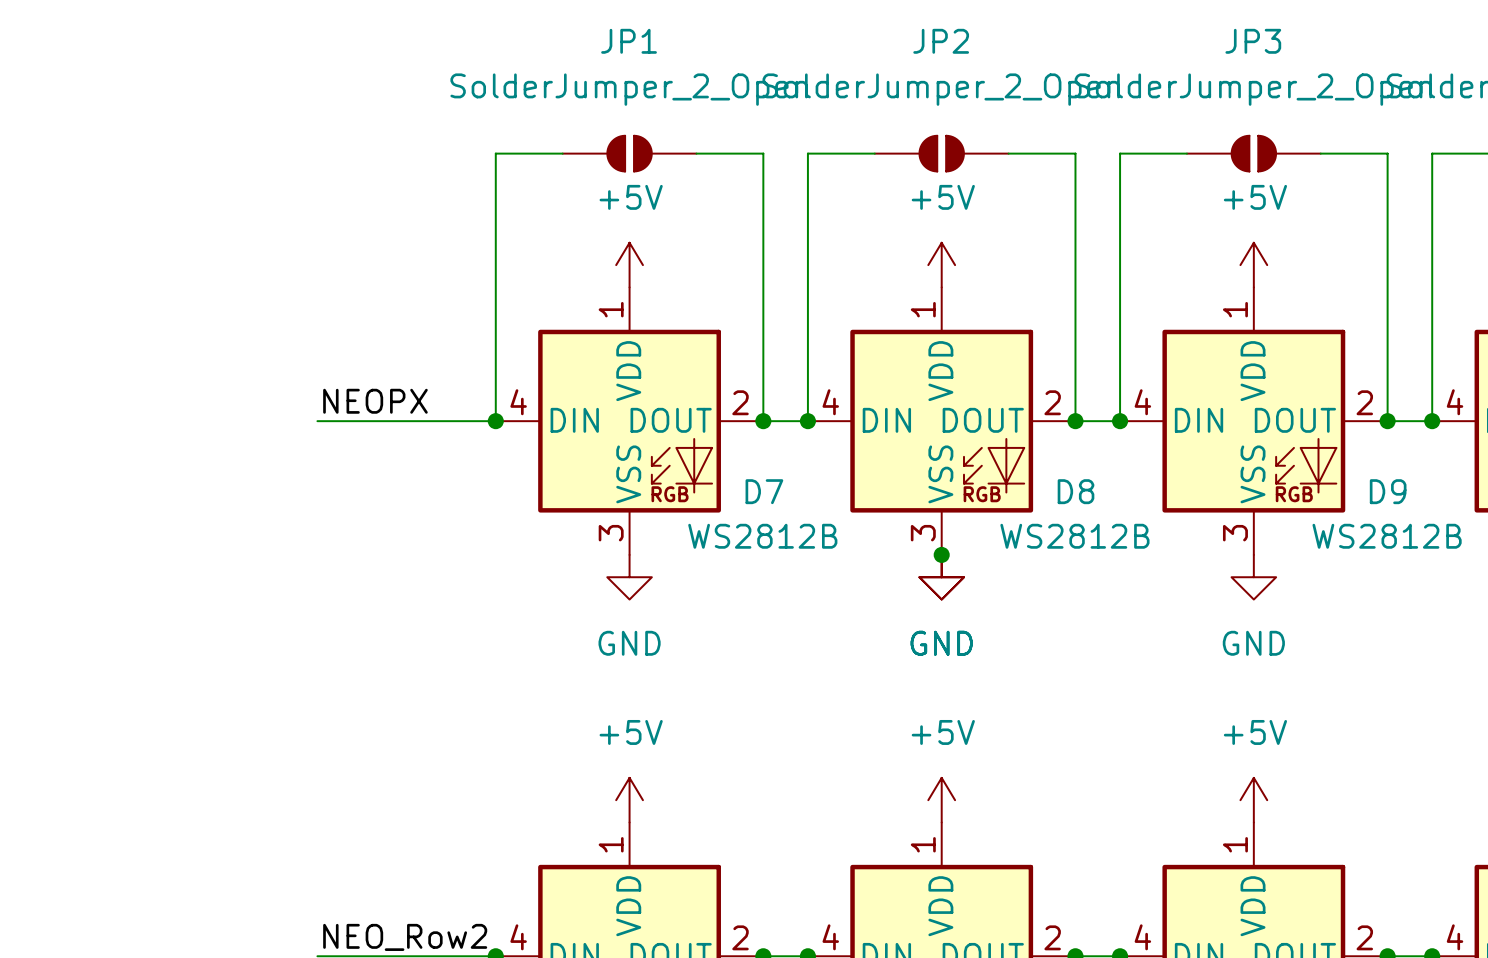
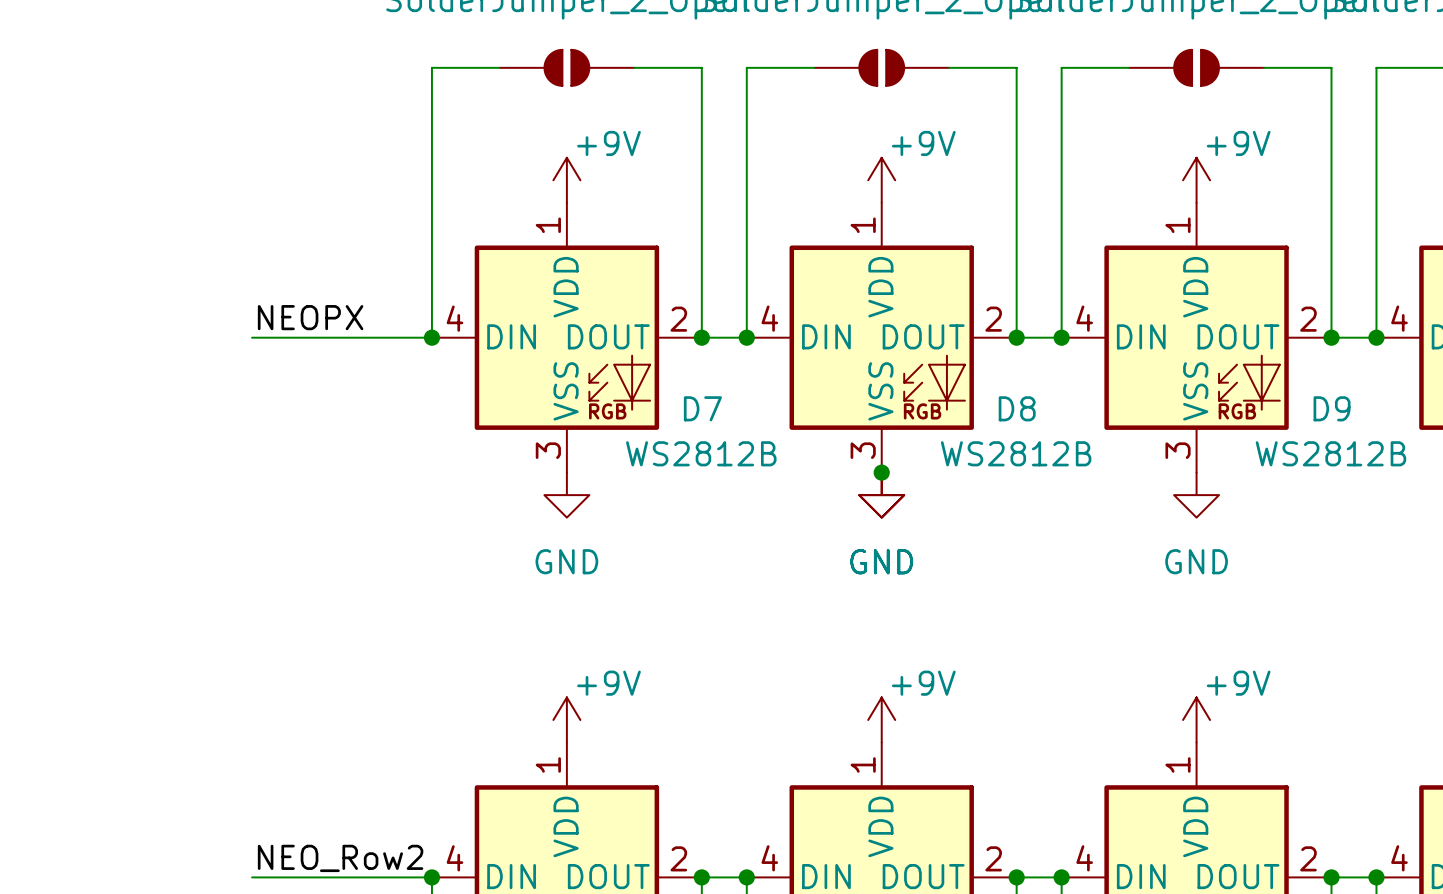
power symbol: +5V (629, 265) -> +9V (566, 180)
power symbol: +5V (941, 265) -> +9V (881, 180)
power symbol: +5V (1253, 265) -> +9V (1196, 180)
power symbol: +5V (629, 800) -> +9V (566, 719)
power symbol: +5V (941, 800) -> +9V (881, 719)
power symbol: +5V (1253, 800) -> +9V (1196, 719)

